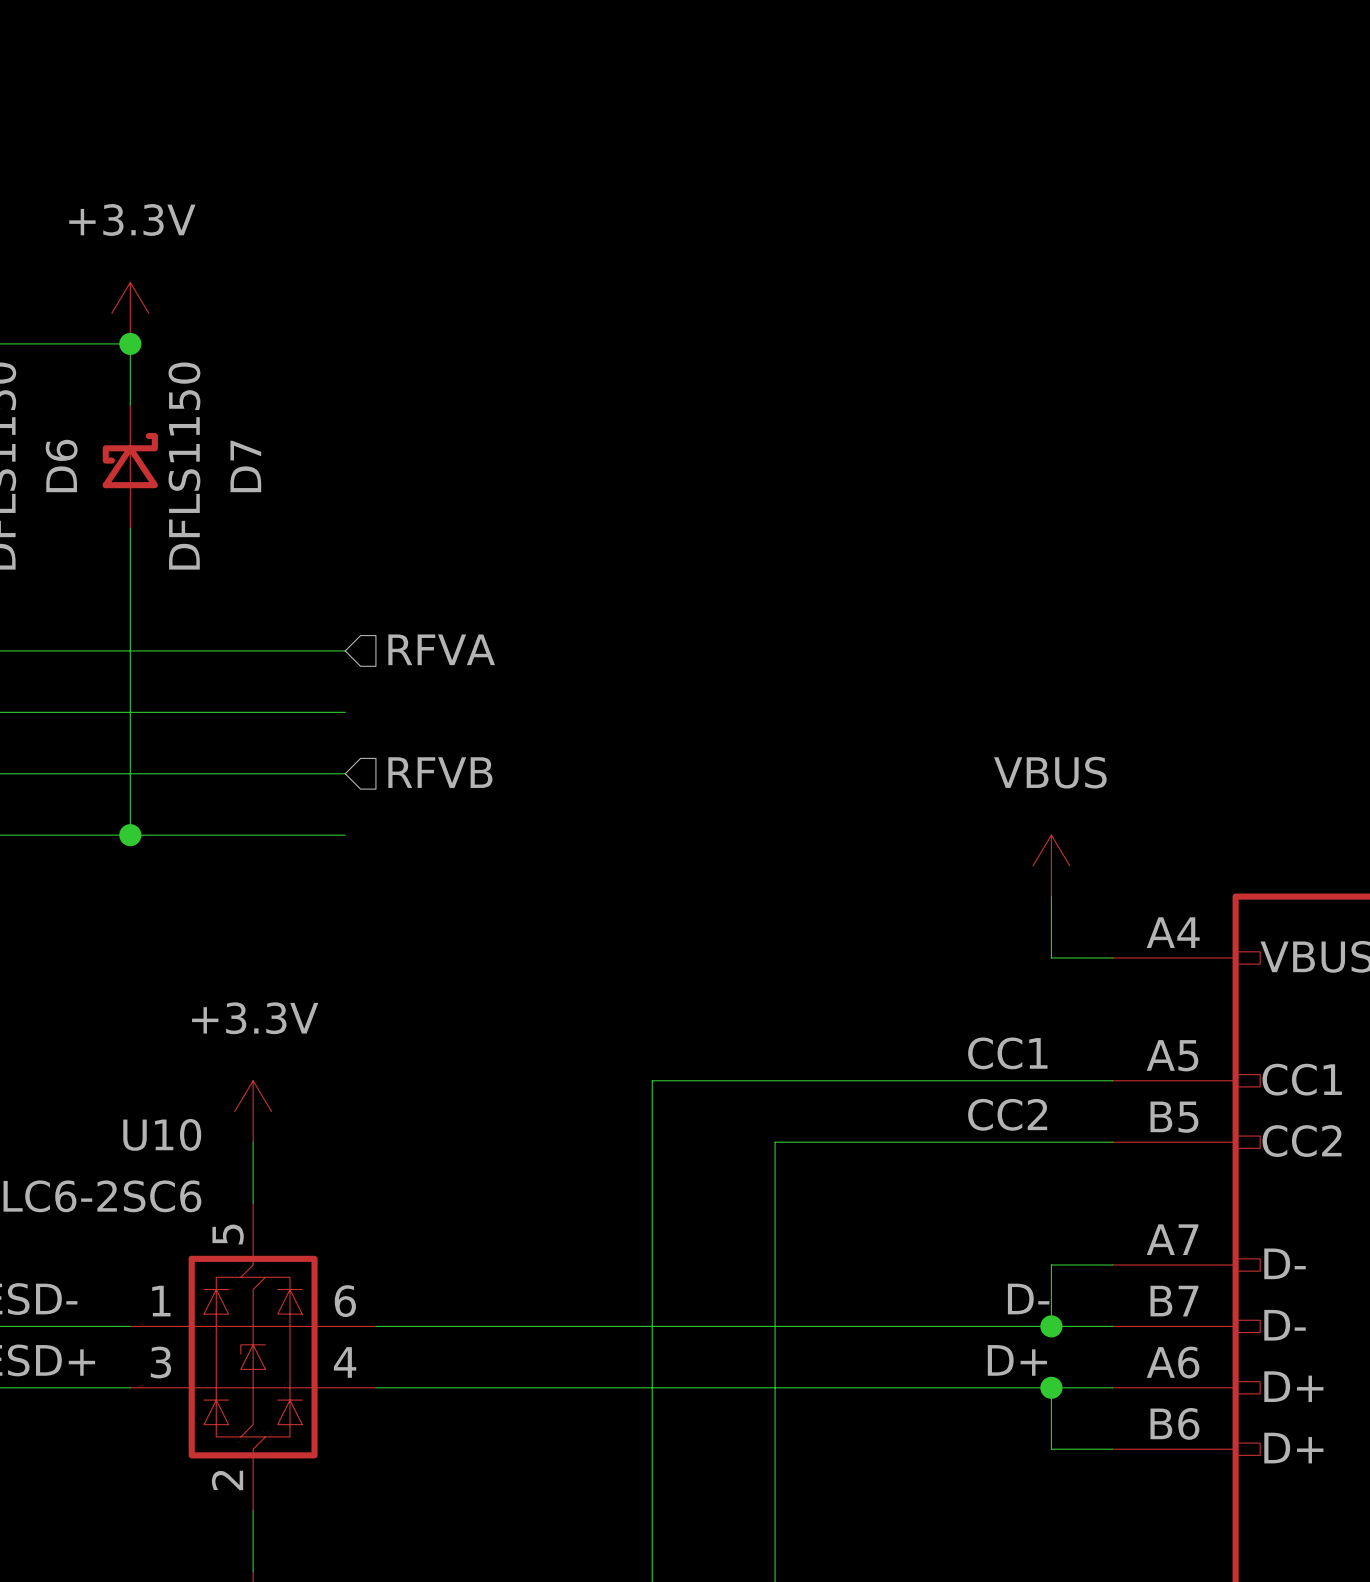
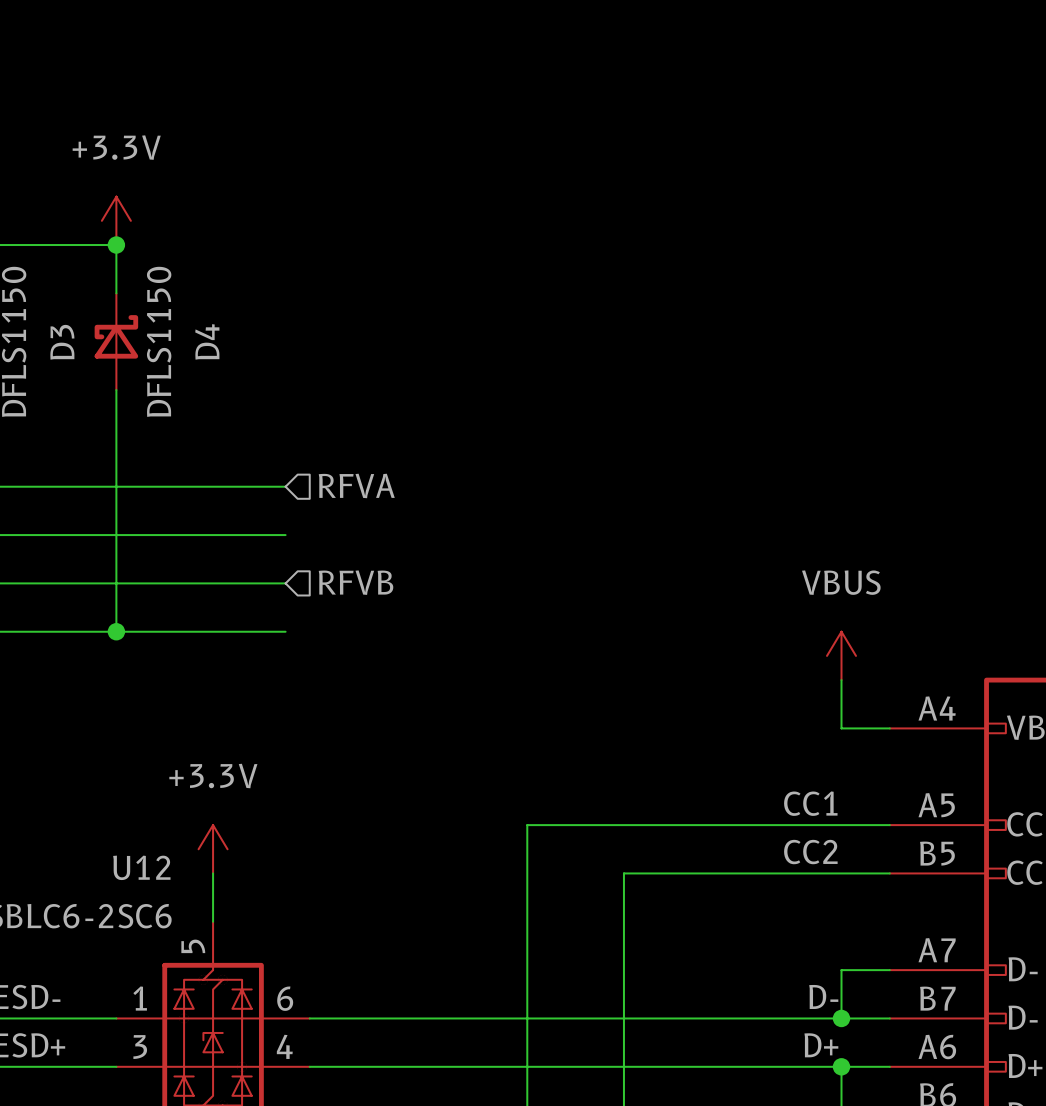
D6 name: D6 (61, 465) -> D3 (62, 342)
D7 name: D7 (245, 466) -> D4 (207, 341)
U10 name: U10 (162, 1134) -> U12 (141, 867)

